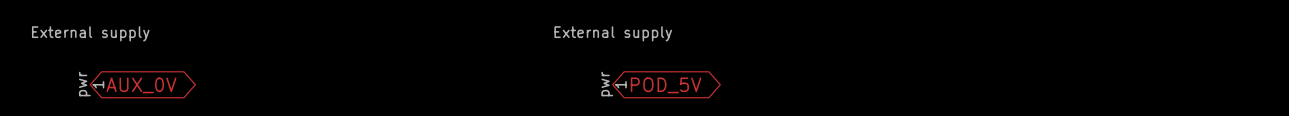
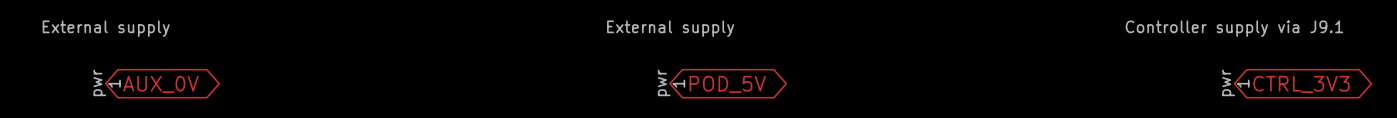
power symbol: none -> Controller supply via J9.1 (1234, 58)
global label: none -> CTRL_3V3 (1301, 84)

